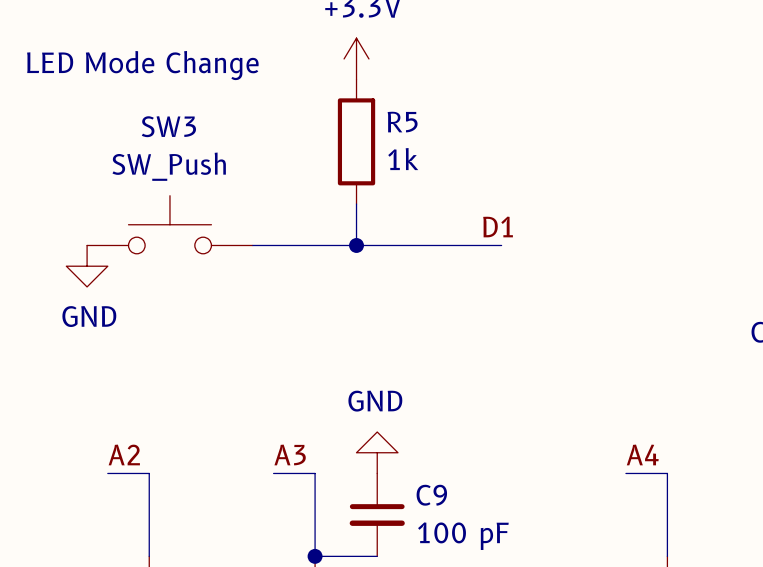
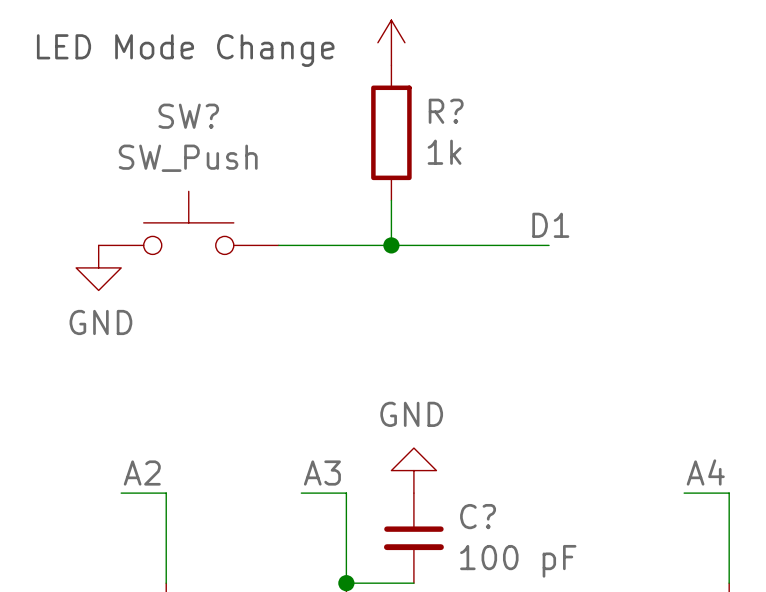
R5 name: R5 (402, 122) -> R? (446, 111)
SW3 name: SW3 (168, 126) -> SW? (188, 116)
C9 name: C9 (431, 495) -> C? (478, 516)

